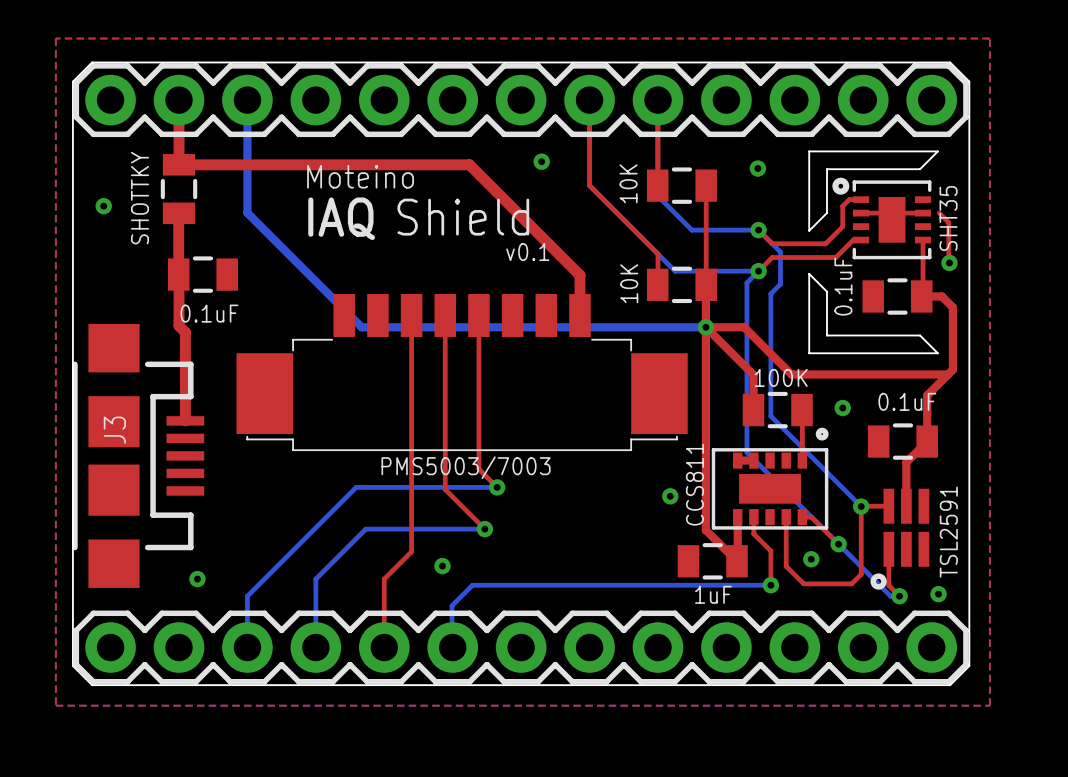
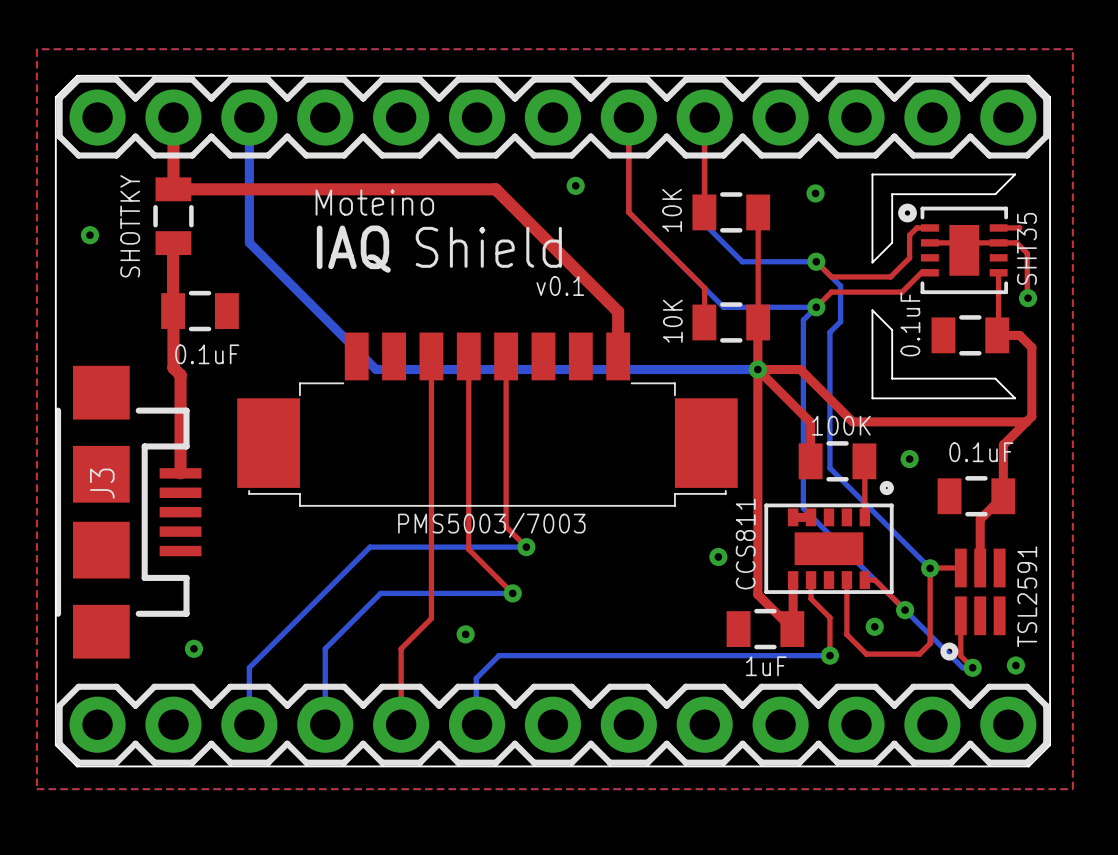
top track: none -> (998, 227) (1019, 227)
top track: none -> (998, 242) (1016, 242)

